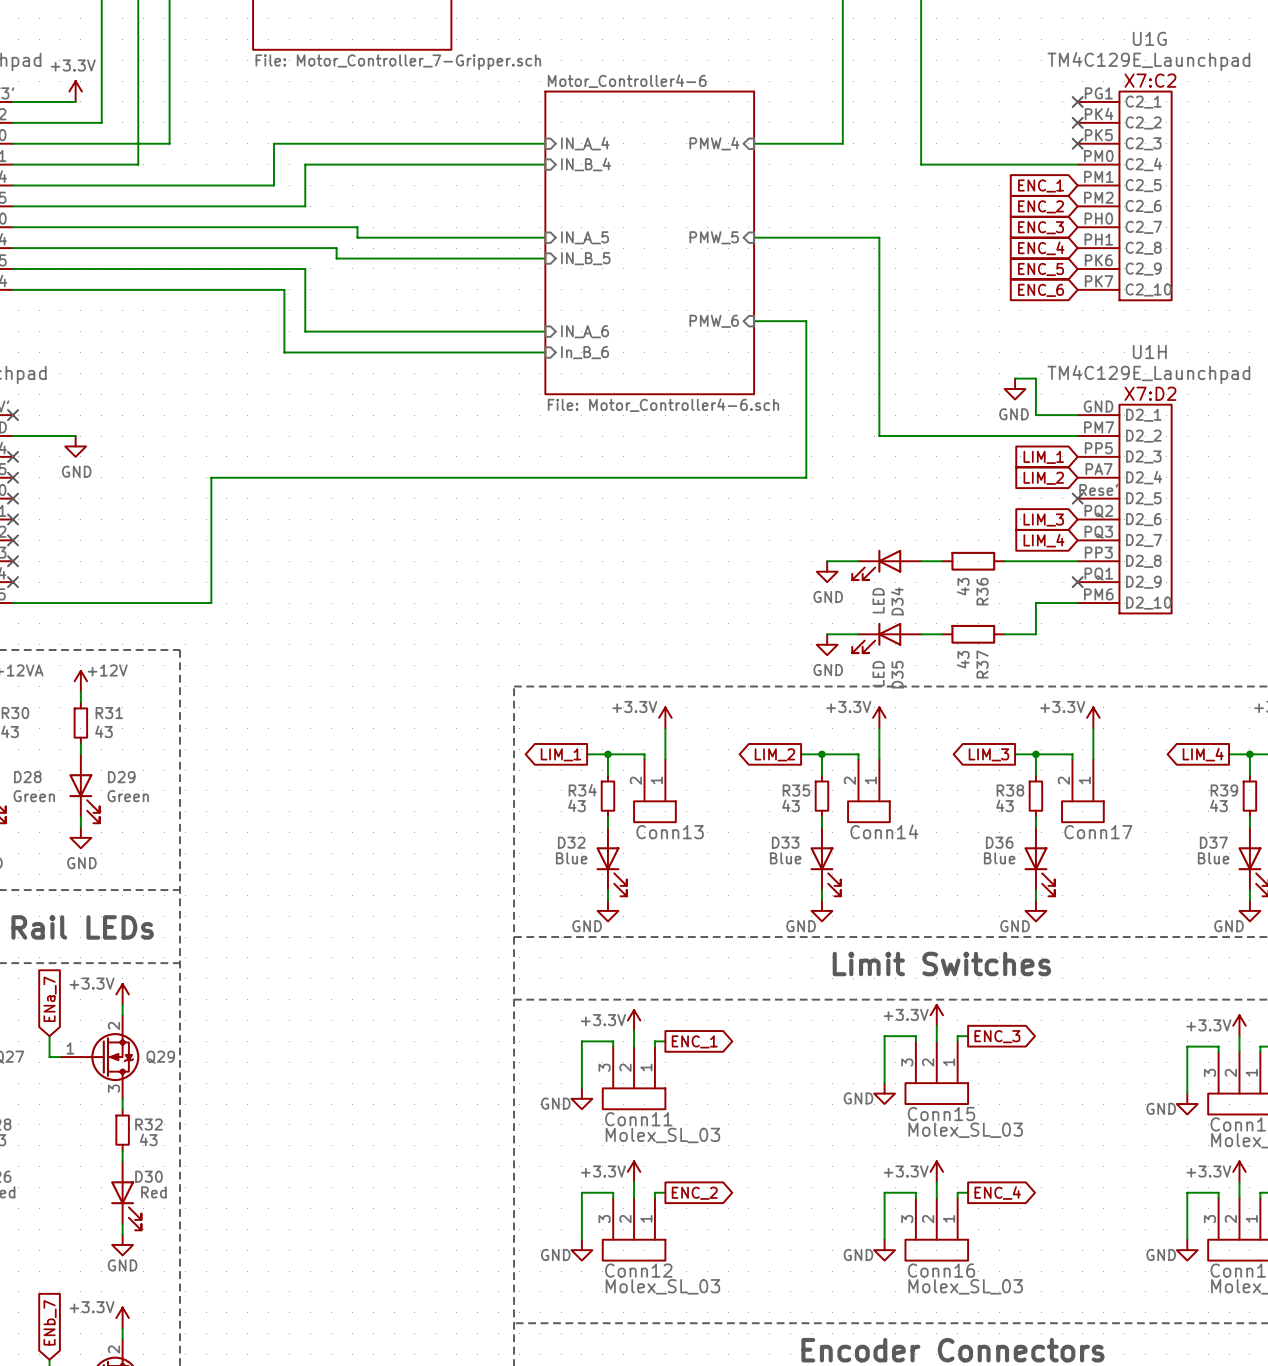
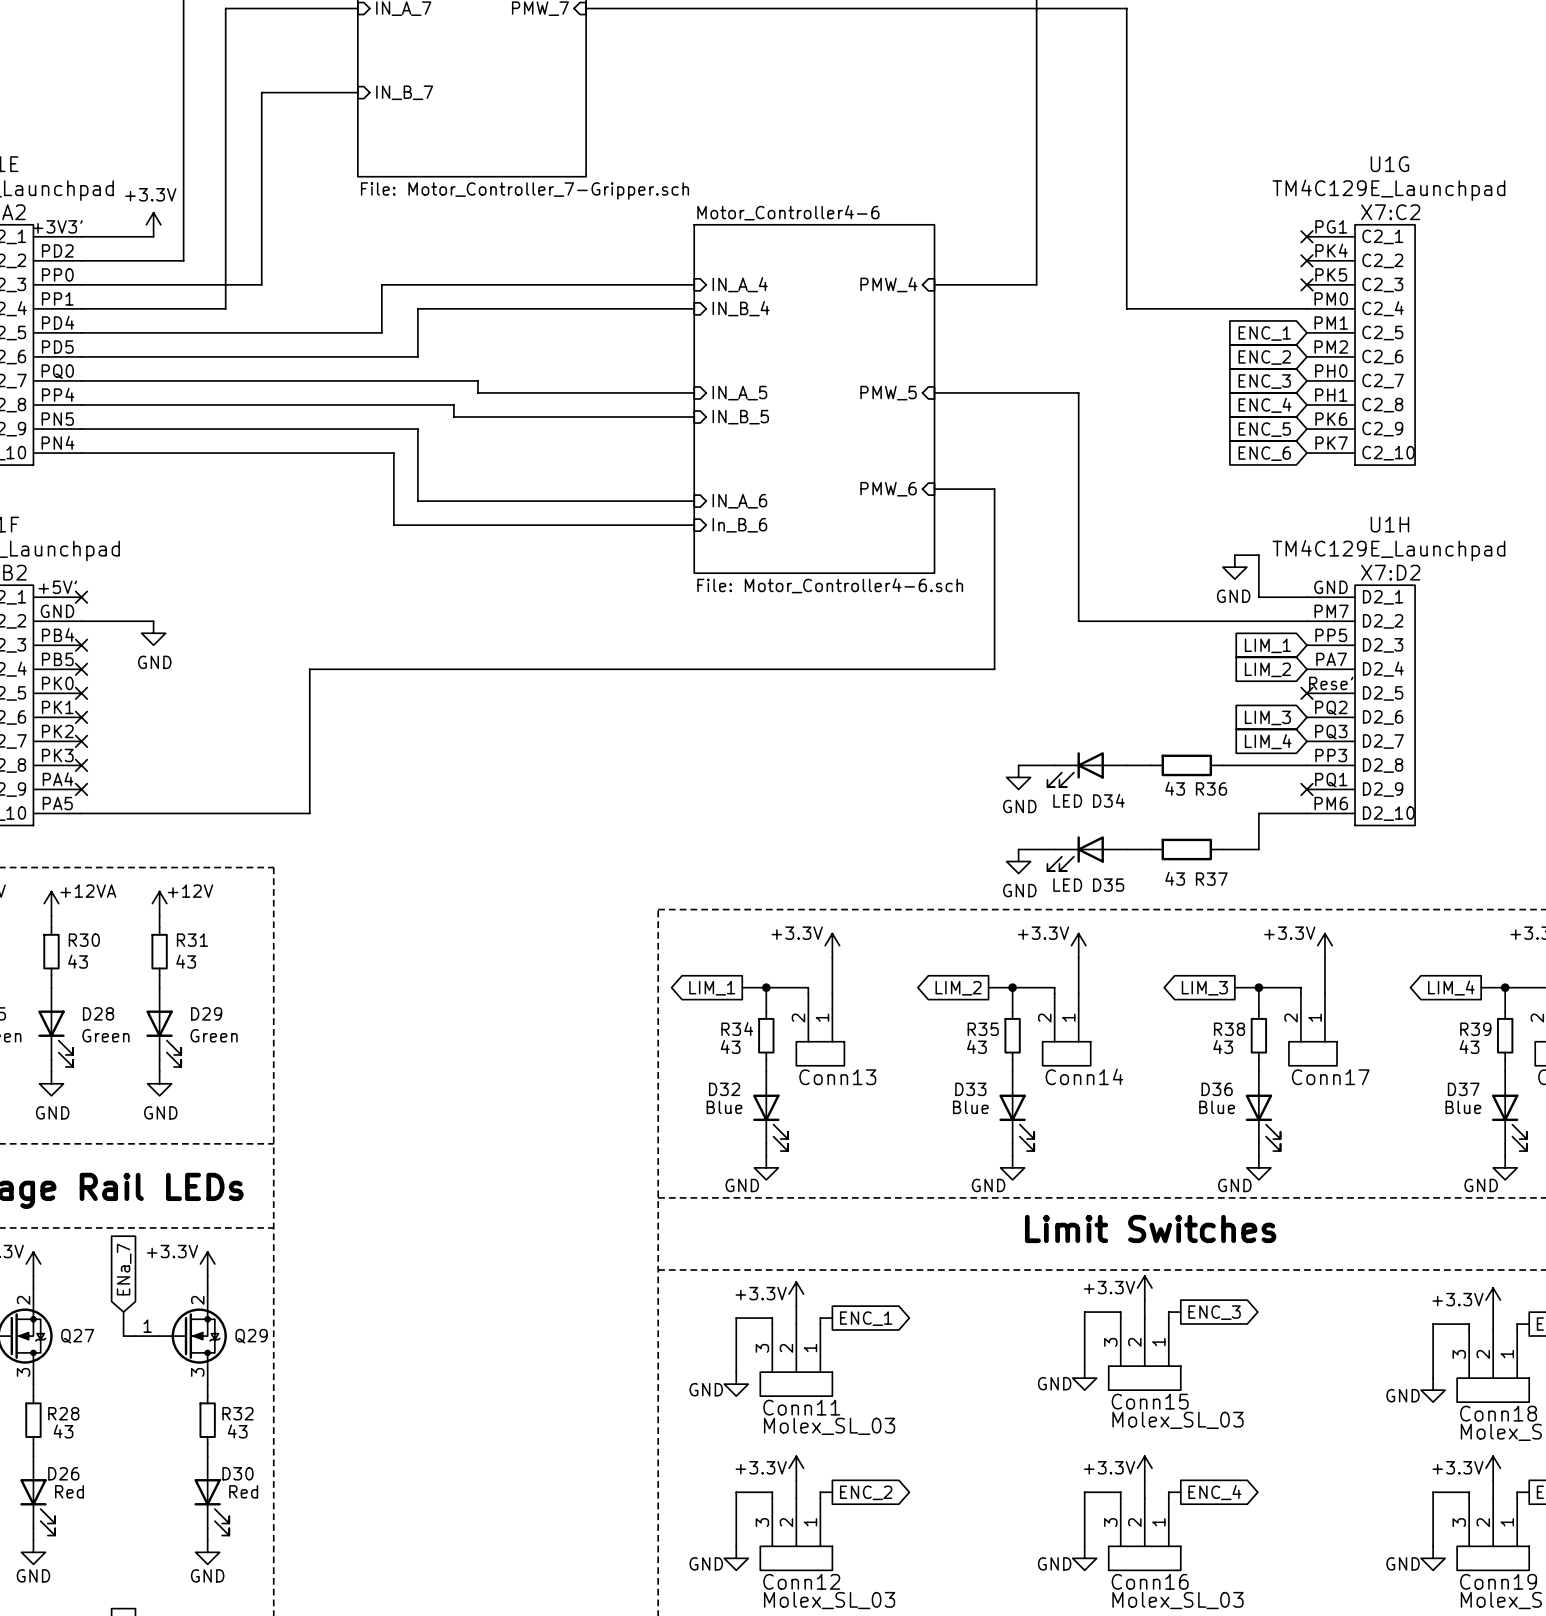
R36 value rotation: 0° (963, 586) -> 90° clockwise (1175, 788)
R36 name rotation: 0° (982, 591) -> 90° clockwise (1211, 788)
D34 value rotation: 0° (878, 600) -> 90° clockwise (1067, 801)
D34 name rotation: 0° (897, 601) -> 90° clockwise (1108, 800)
R37 value rotation: 0° (963, 659) -> 90° clockwise (1175, 878)
R37 name rotation: 0° (982, 664) -> 90° clockwise (1211, 879)
D35 value rotation: 0° (878, 673) -> 90° clockwise (1067, 885)
D35 name rotation: 0° (897, 674) -> 90° clockwise (1108, 885)

